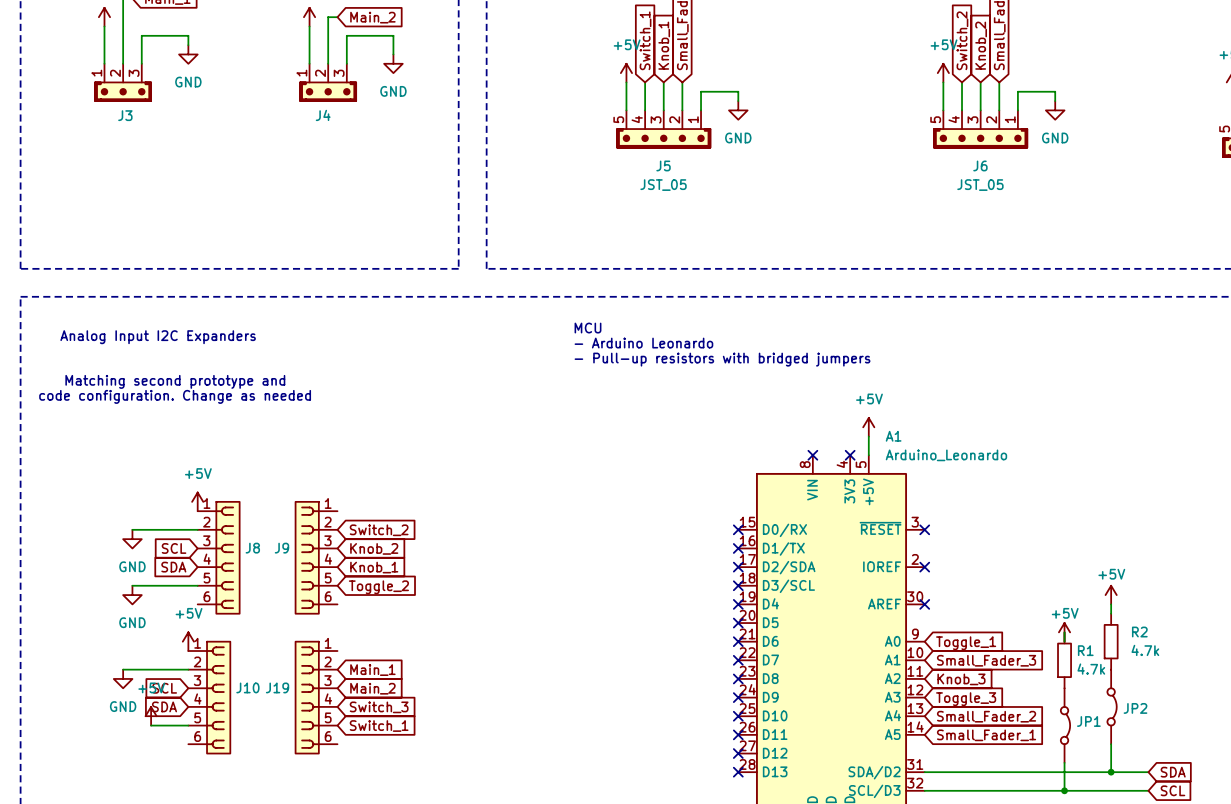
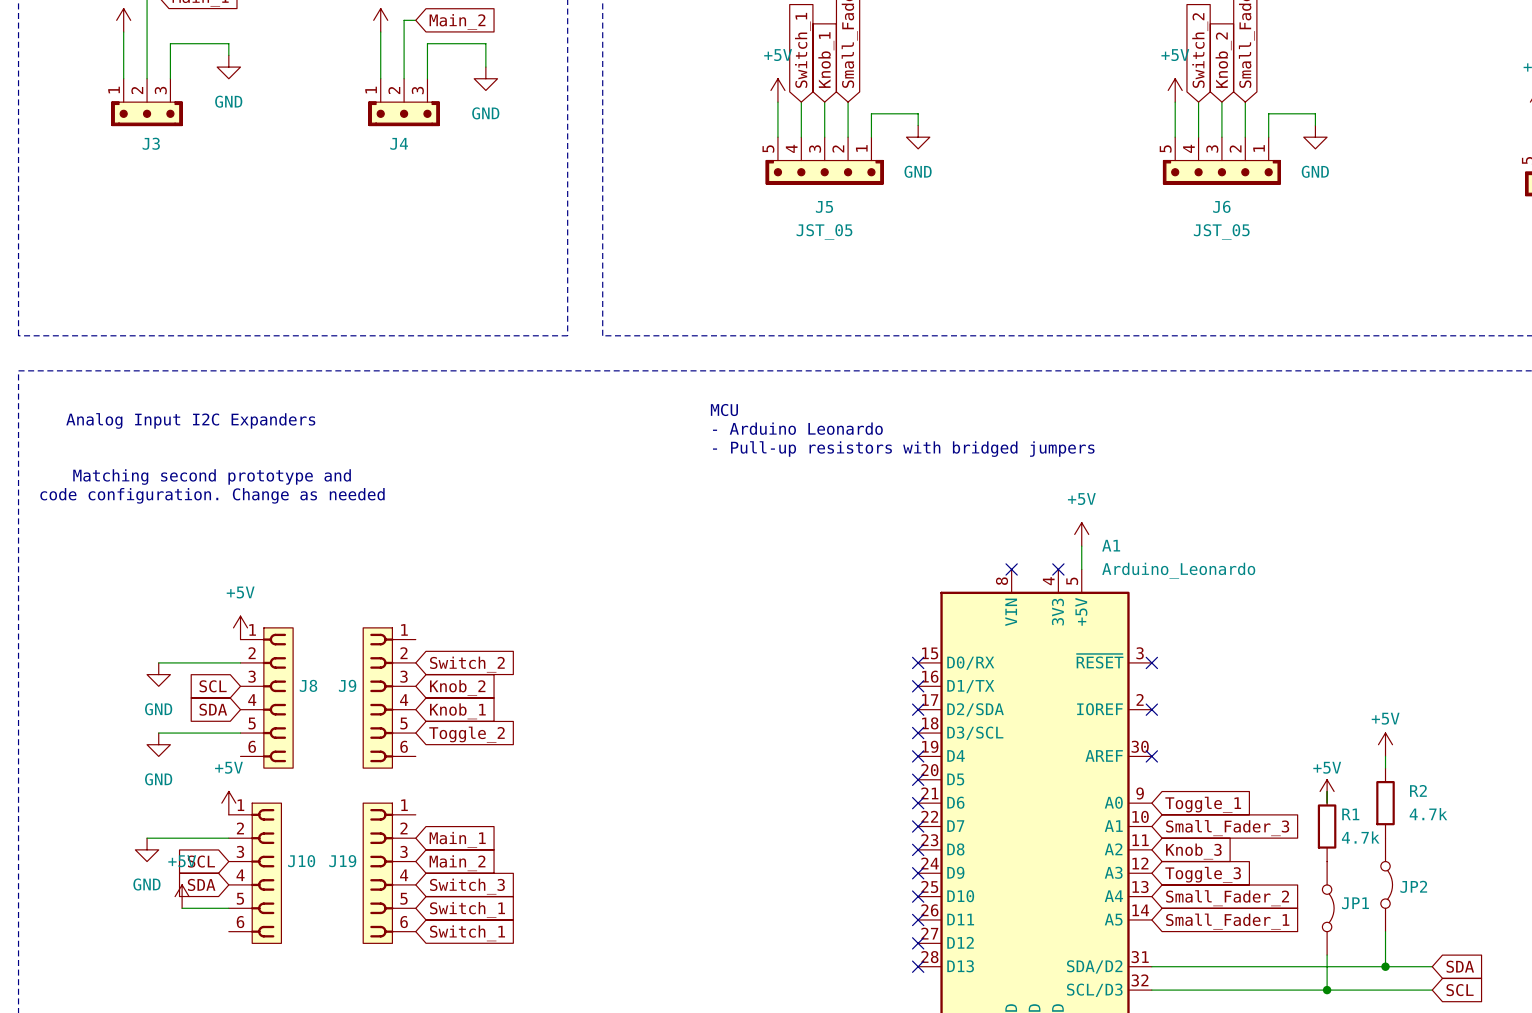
global label: none -> Switch_1 (467, 933)

